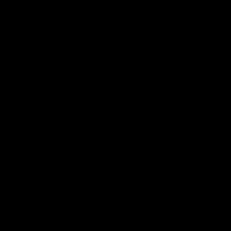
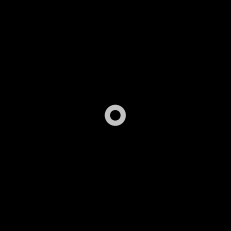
via: none -> (115, 115)

